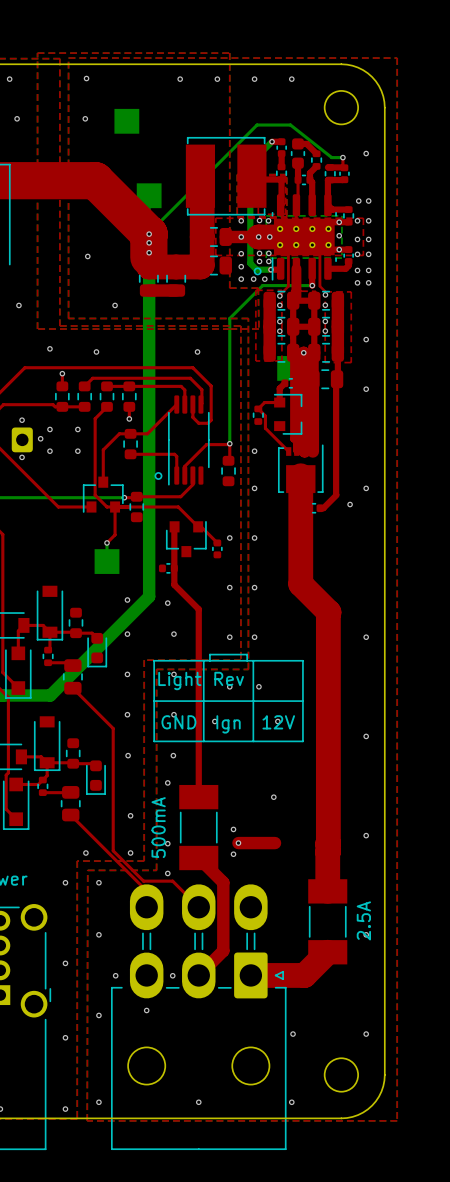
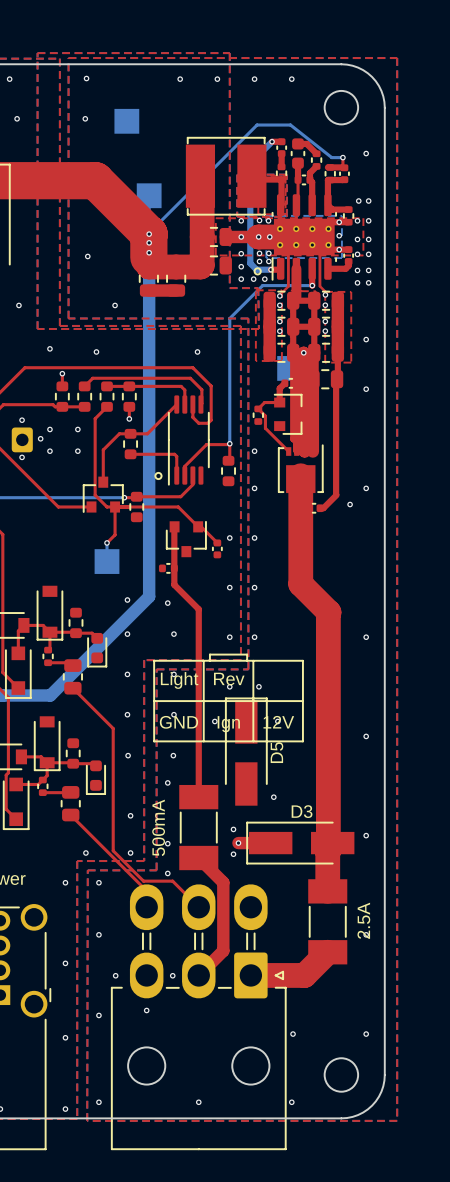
D5: none -> (246, 751)
D3: none -> (300, 843)

